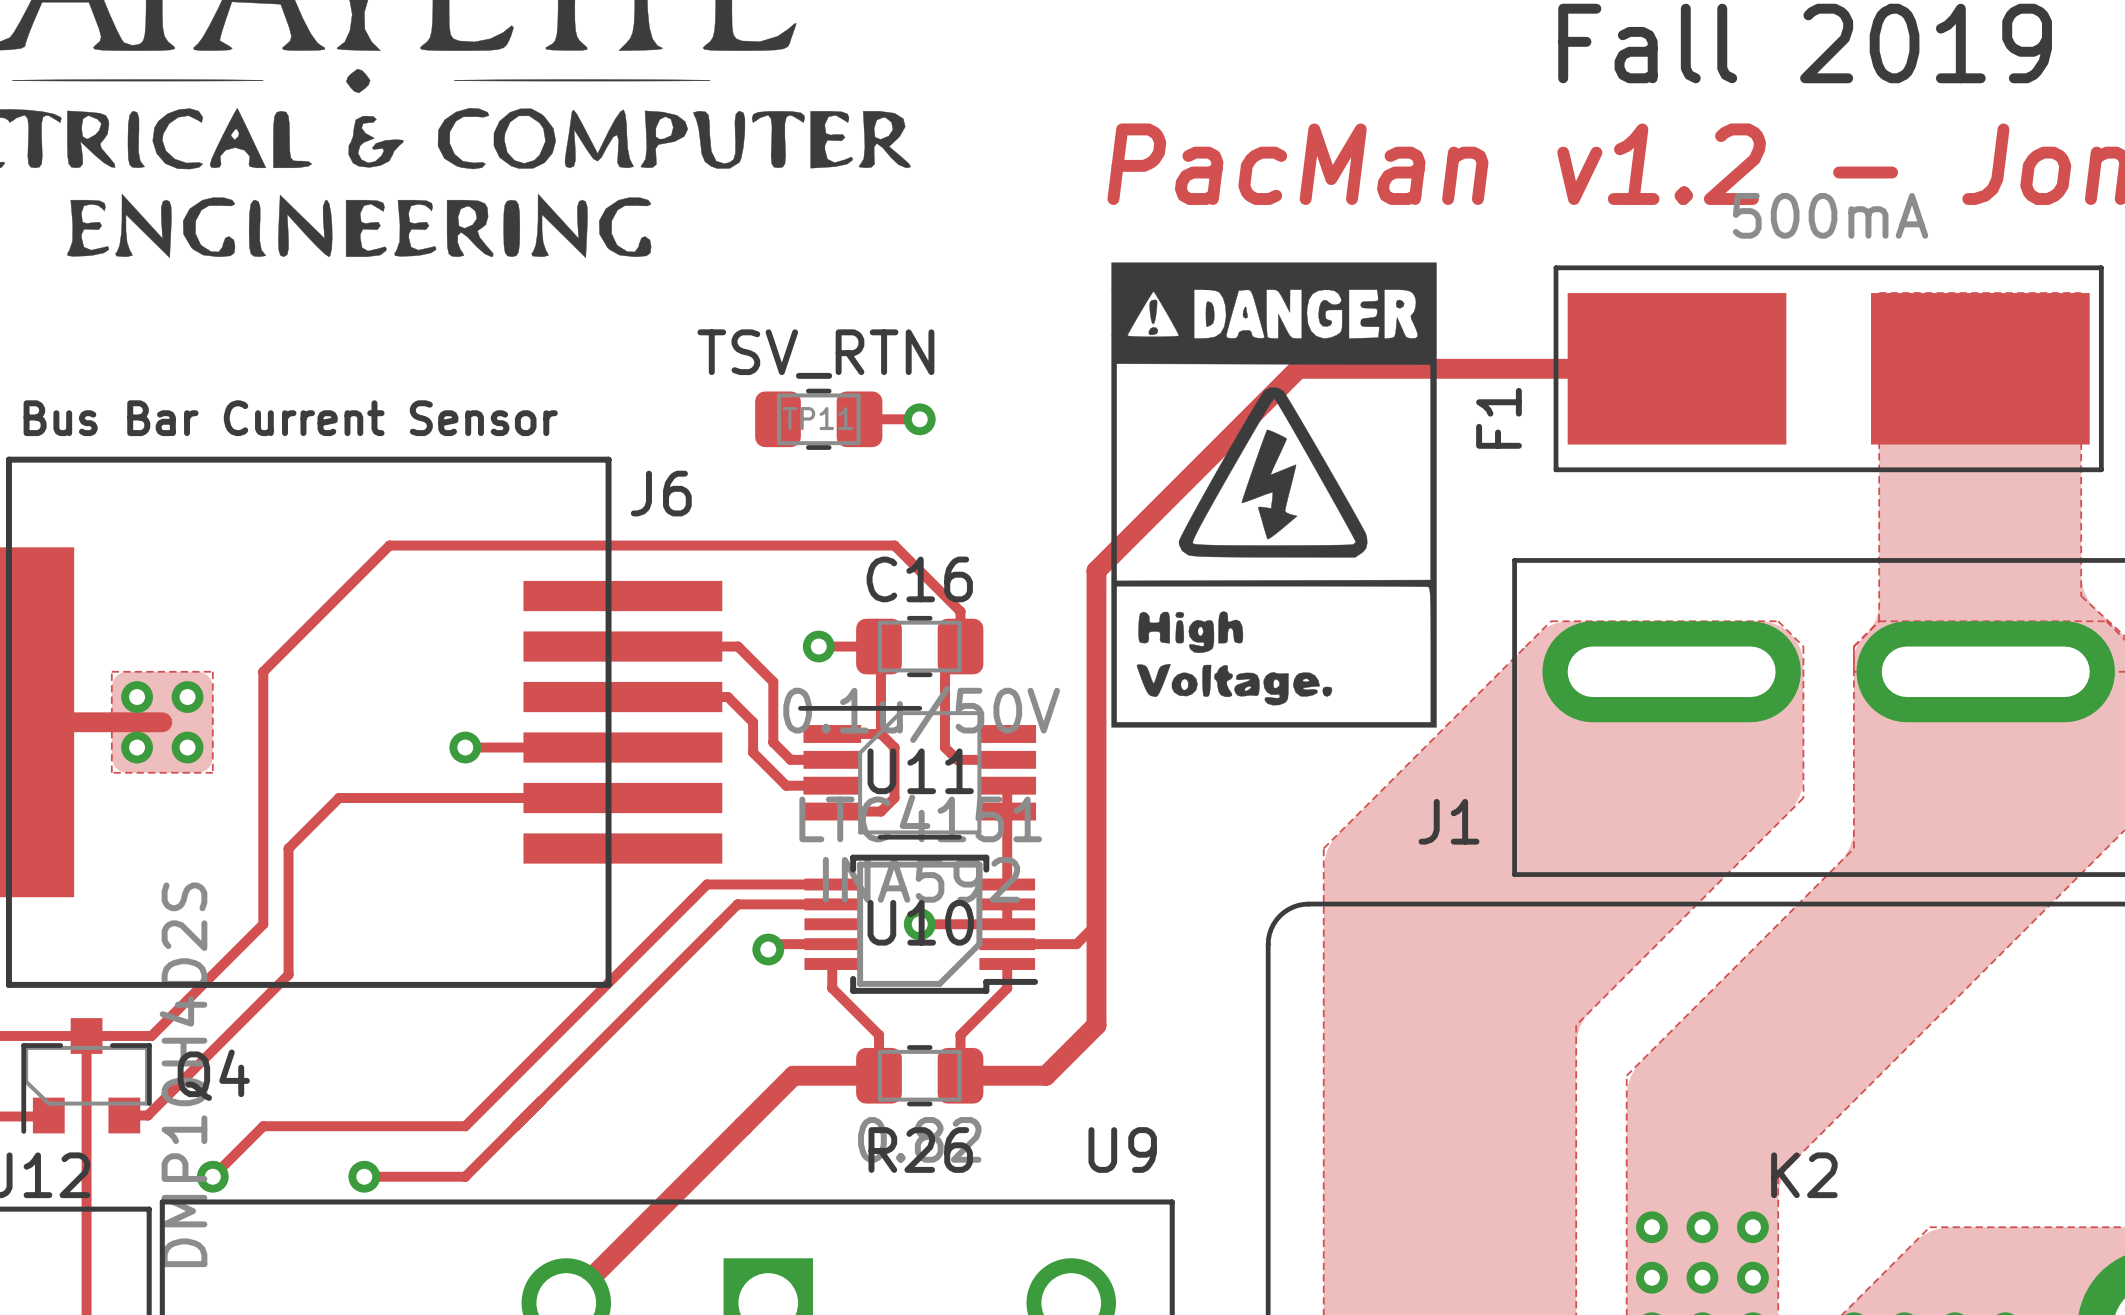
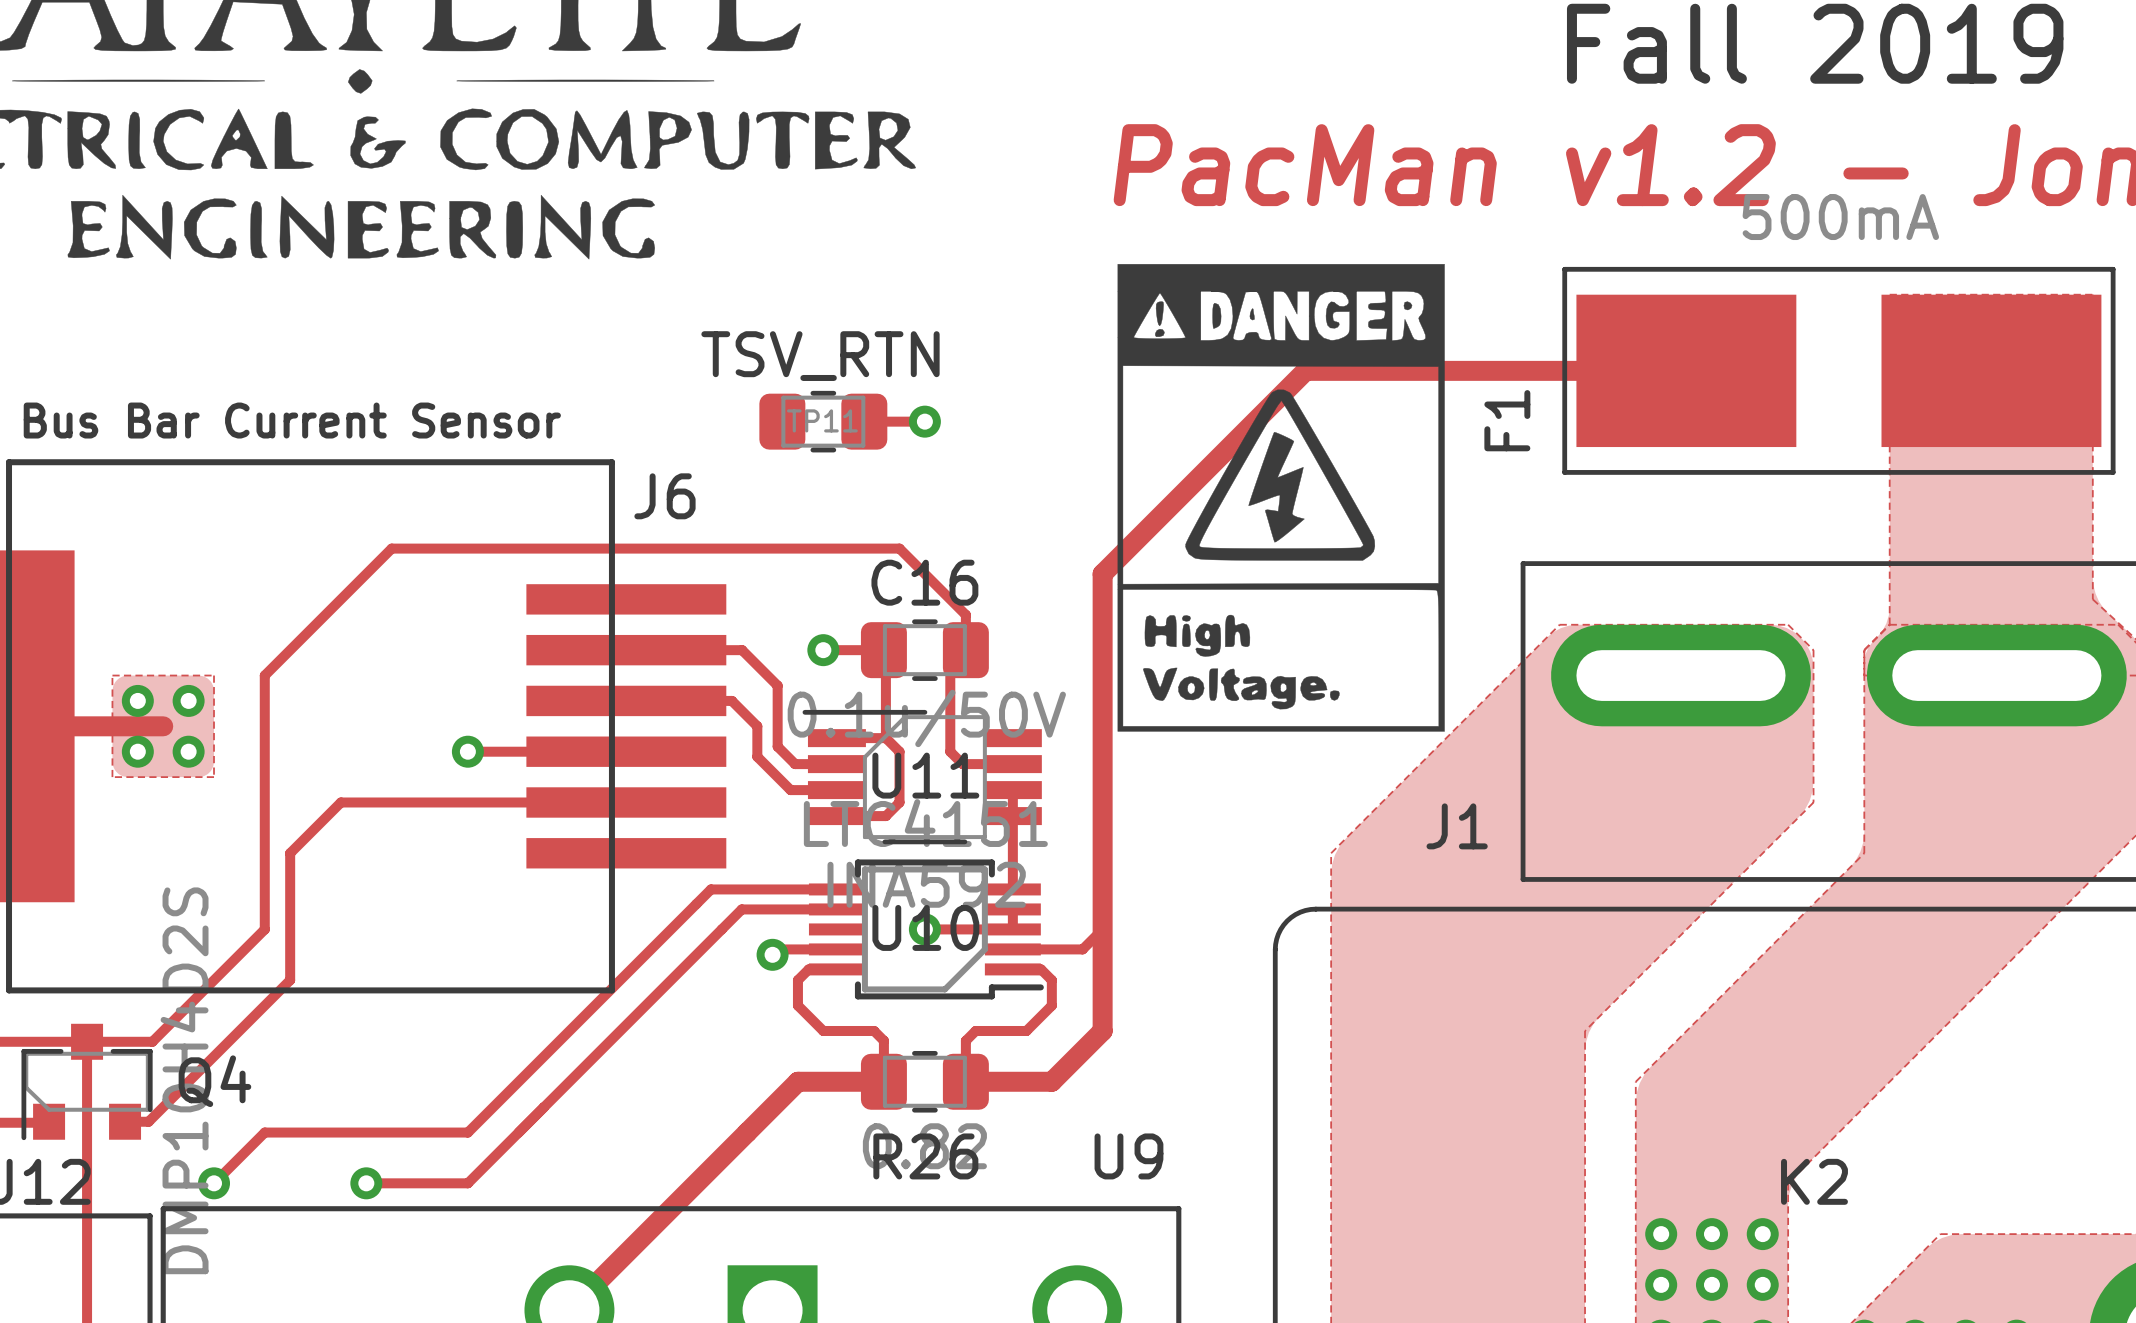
track: (832, 964) (832, 988) (869, 1025) -> (836, 969) (808, 969) (797, 980) (797, 1005) (823, 1030) (874, 1030)
track: (1007, 964) (1007, 988) (970, 1025) -> (1012, 969) (1041, 969) (1051, 980) (1051, 1005) (1026, 1030) (975, 1030)

